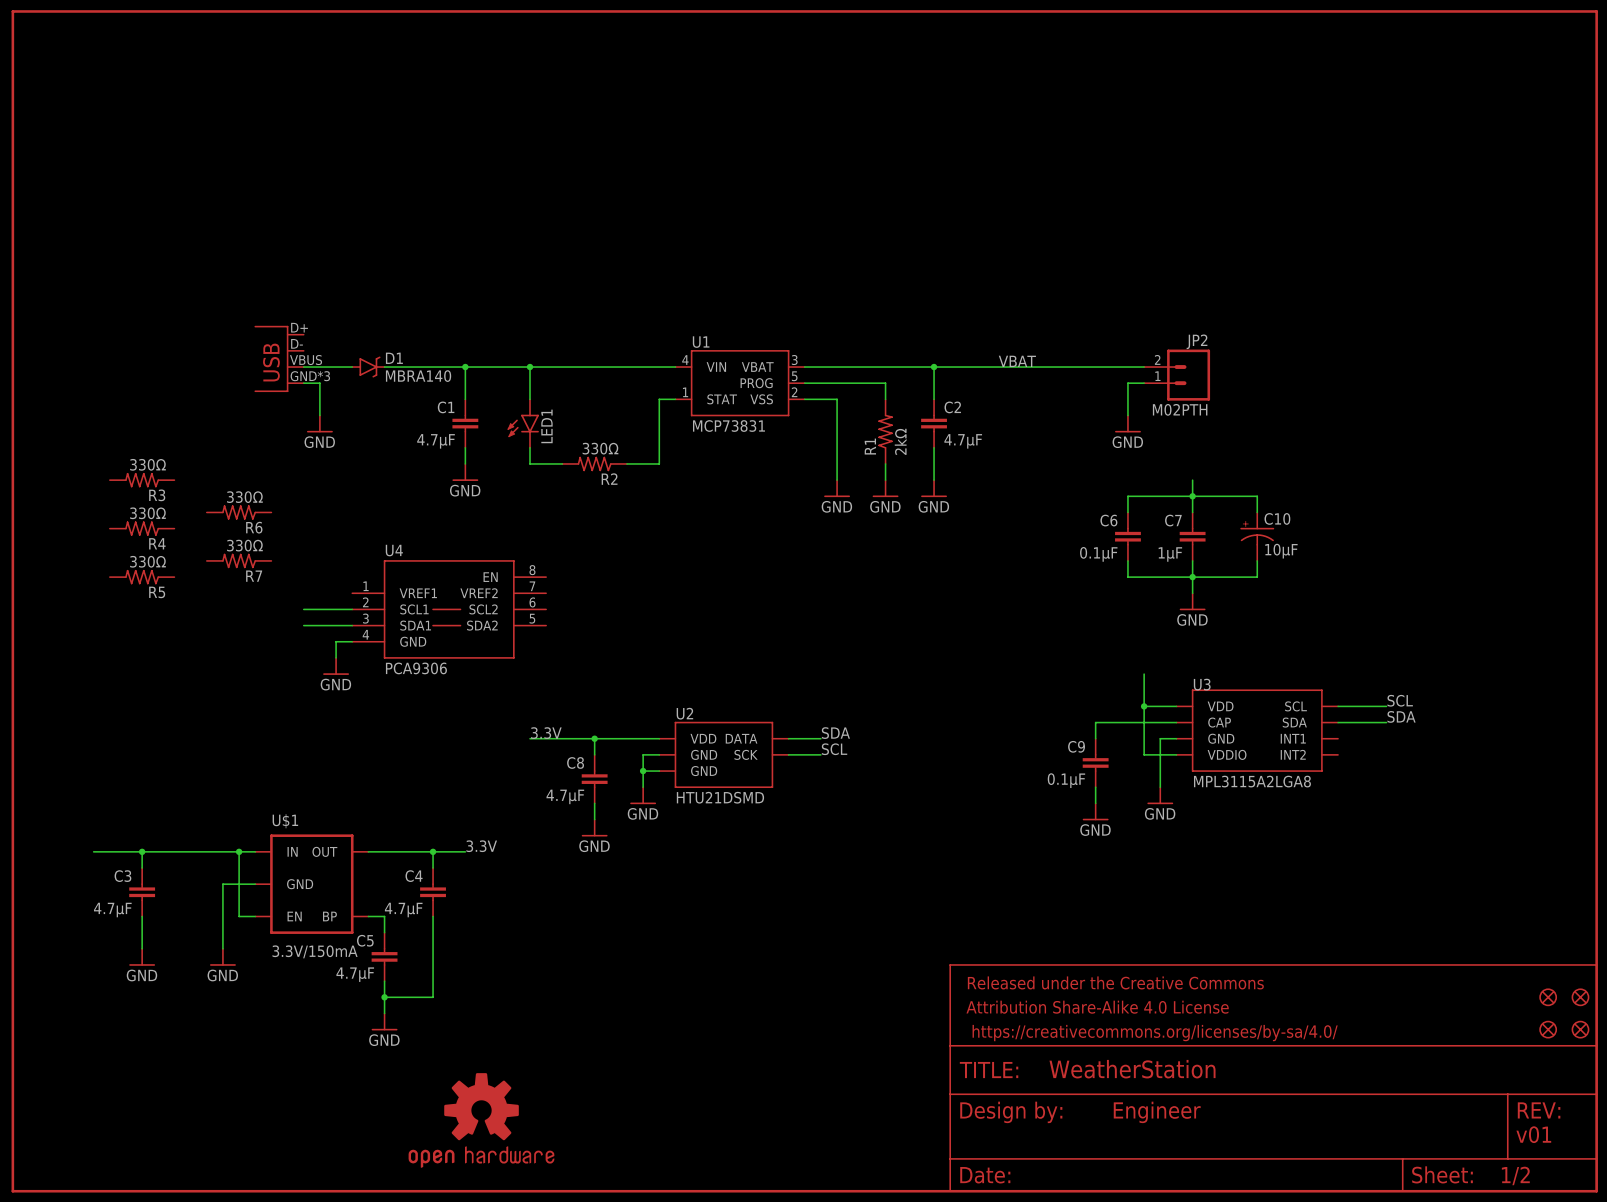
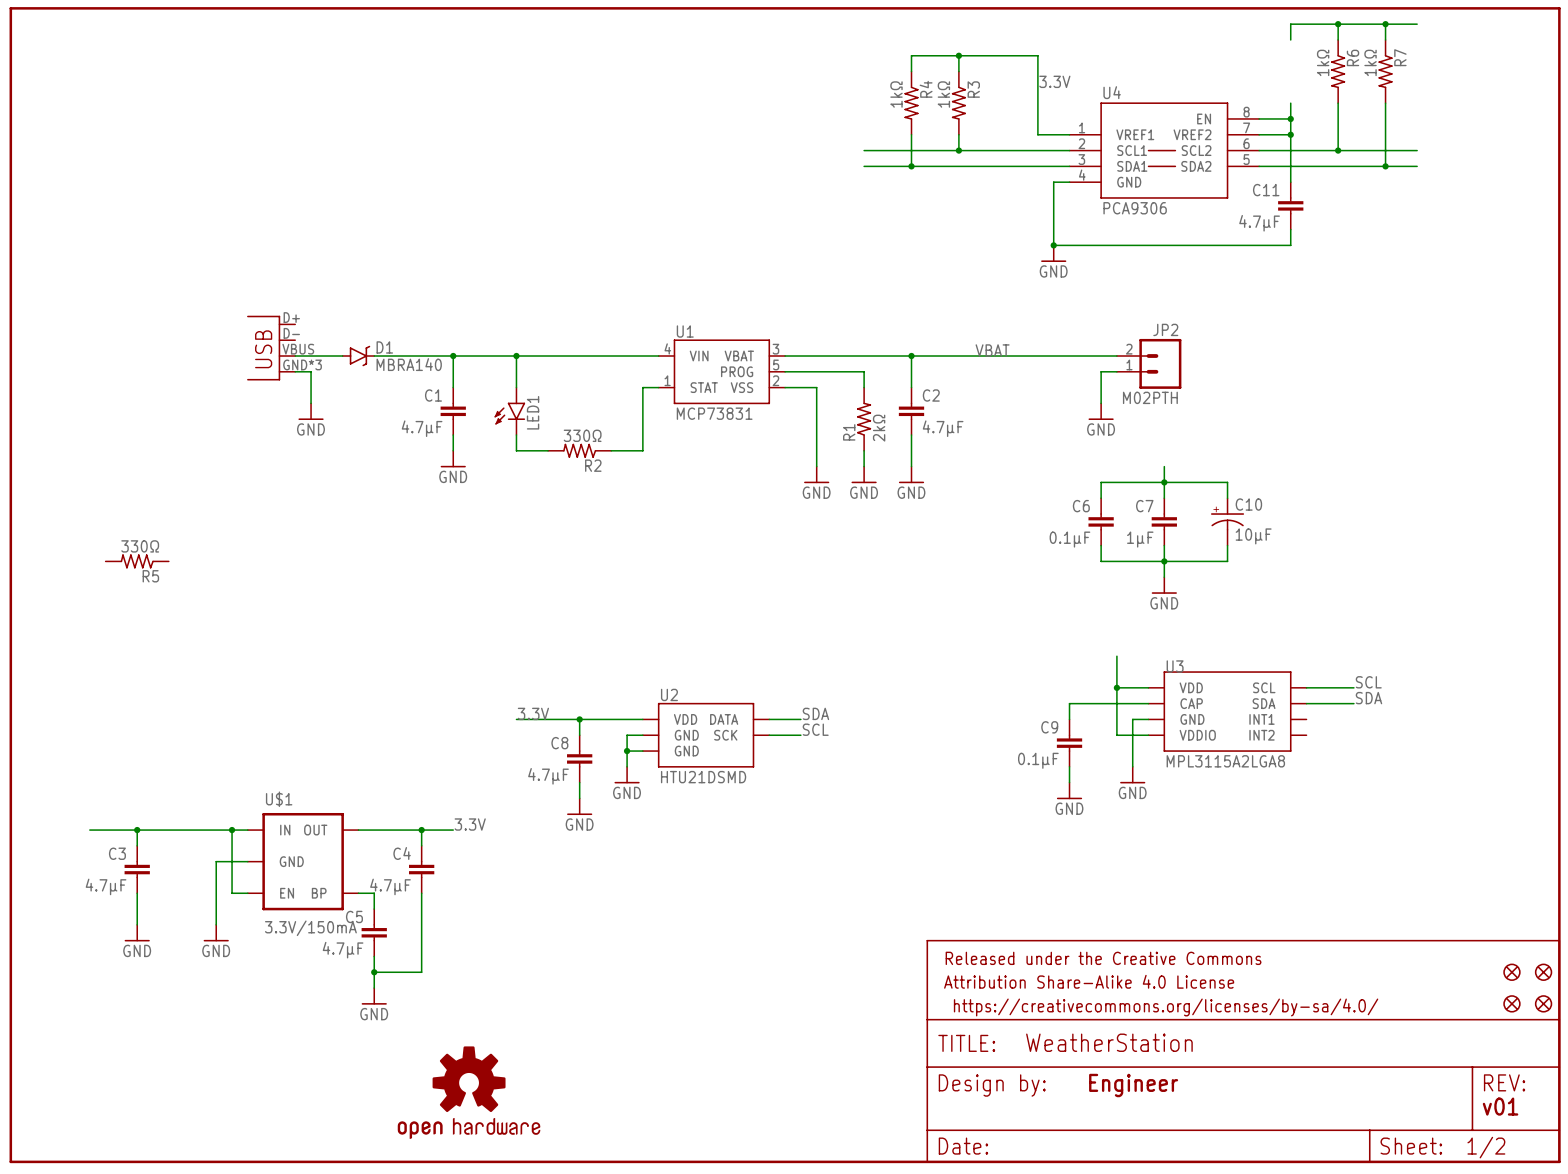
wire: none -> (1338, 24) (1338, 39)
junction: none -> (1338, 24)
wire: none -> (1385, 24) (1385, 39)
junction: none -> (1385, 24)
wire: none -> (1417, 24) (1290, 24) (1290, 39)
wire: none -> (958, 55) (958, 71)
junction: none -> (958, 55)
wire: none -> (911, 71) (911, 55) (1037, 55) (1037, 134) (1069, 134)
label: none -> 3.3V (1054, 81)
wire: none -> (1290, 103) (1290, 182)
wire: none -> (1338, 103) (1338, 150)
wire: none -> (1385, 103) (1385, 166)
wire: none -> (1259, 118) (1290, 118)
junction: none -> (1290, 118)
wire: none -> (911, 134) (911, 166)
wire: none -> (958, 134) (958, 150)
wire: none -> (1259, 134) (1290, 134)
junction: none -> (1290, 134)
wire: none -> (864, 150) (1069, 150)
junction: none -> (958, 150)
wire: none -> (1259, 150) (1417, 150)
junction: none -> (1338, 150)
wire: none -> (864, 166) (1069, 166)
junction: none -> (911, 166)
wire: none -> (1259, 166) (1417, 166)
junction: none -> (1385, 166)
wire: none -> (1069, 182) (1053, 182) (1053, 245) (1290, 245) (1290, 229)
C11: none -> 4.7µF (1290, 205)
junction: none -> (1053, 245)
power symbol: none -> GND (1053, 253)
R3 value: 330Ω (147, 464) -> 1kΩ (943, 94)
R3 rotation: 0° (142, 480) -> 90° counterclockwise (958, 103)
R3 position: (142, 480) -> (958, 103)
R6 value: 330Ω (244, 497) -> 1kΩ (1323, 62)
R6 rotation: 0° (239, 512) -> 90° counterclockwise (1338, 71)
R6 position: (239, 512) -> (1338, 71)
R4 value: 330Ω (147, 513) -> 1kΩ (896, 94)
R4 rotation: 0° (142, 528) -> 90° counterclockwise (911, 103)
R4 position: (142, 528) -> (911, 103)
R7 value: 330Ω (244, 545) -> 1kΩ (1370, 62)
R7 rotation: 0° (239, 560) -> 90° counterclockwise (1385, 71)
R7 position: (239, 560) -> (1385, 71)
wire: (303, 609) (352, 609) -> none
U4 position: (449, 609) -> (1164, 150)
wire: (303, 625) (352, 625) -> none
wire: (352, 641) (336, 641) (336, 657) -> none
power symbol: GND (336, 666) -> none

